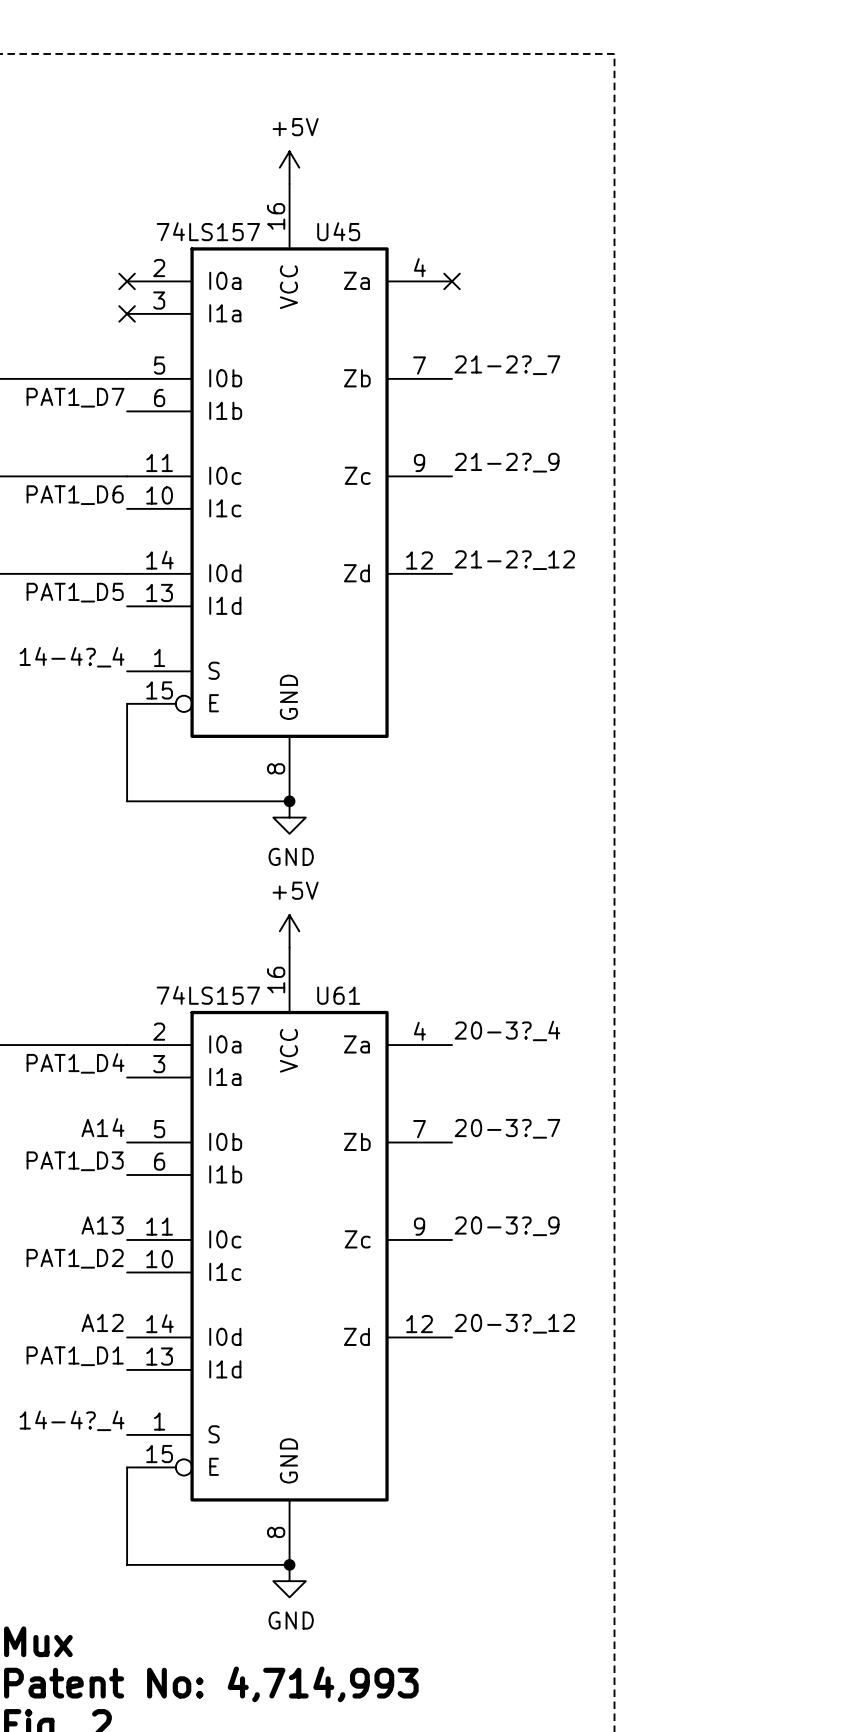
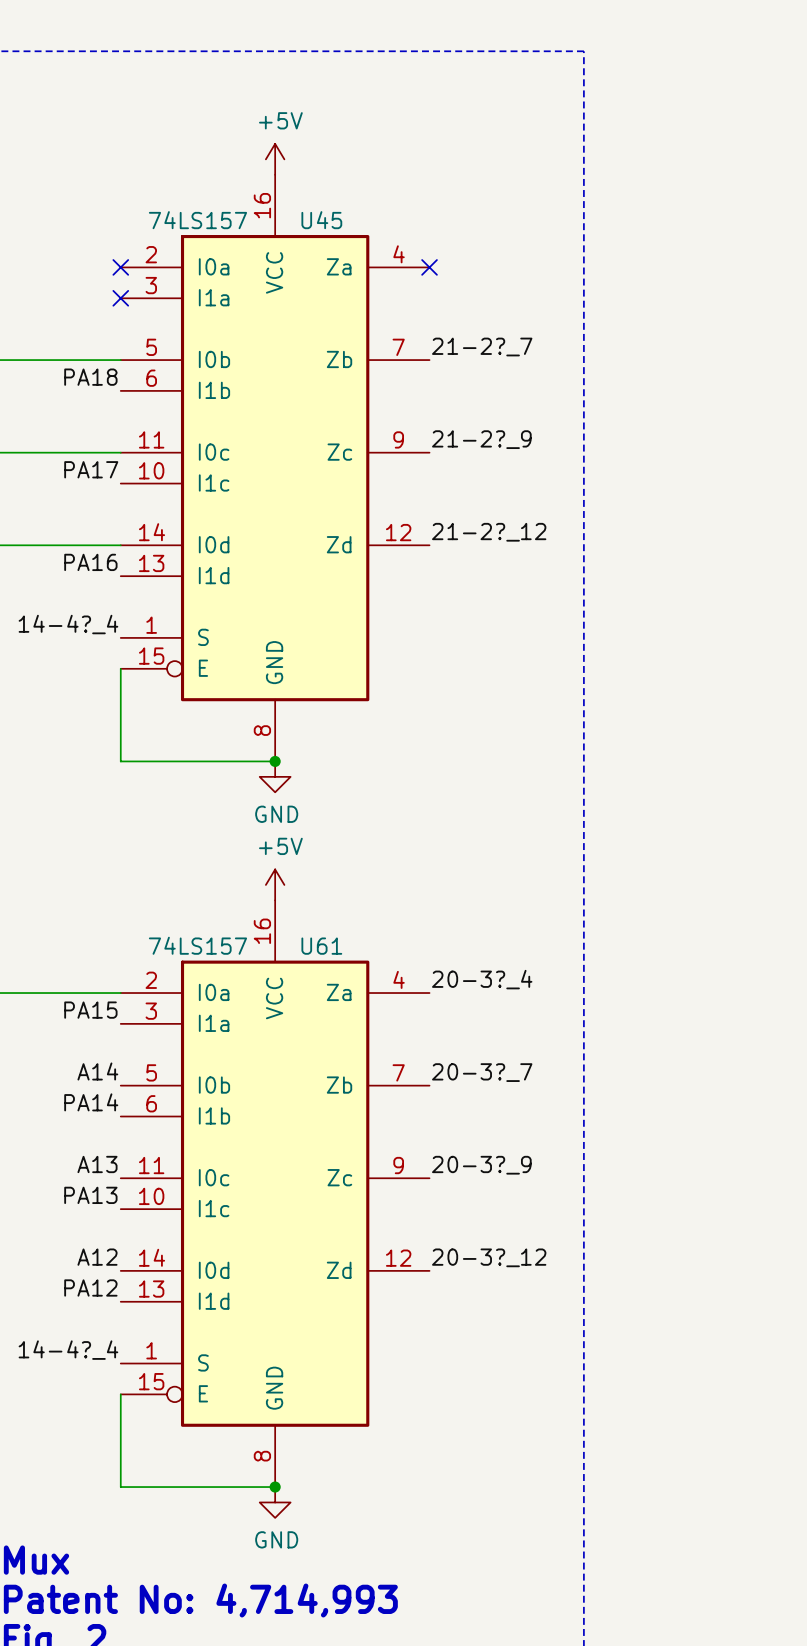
label: PAT1_D7 (75, 397) -> PA18 (90, 377)
label: PAT1_D6 (75, 495) -> PA17 (91, 469)
label: PAT1_D5 (75, 592) -> PA16 (90, 562)
label: PAT1_D4 (75, 1063) -> PA15 (90, 1010)
label: PAT1_D3 (75, 1161) -> PA14 (91, 1102)
label: PAT1_D2 (75, 1258) -> PA13 (90, 1195)
label: PAT1_D1 (75, 1356) -> PA12 (90, 1287)

